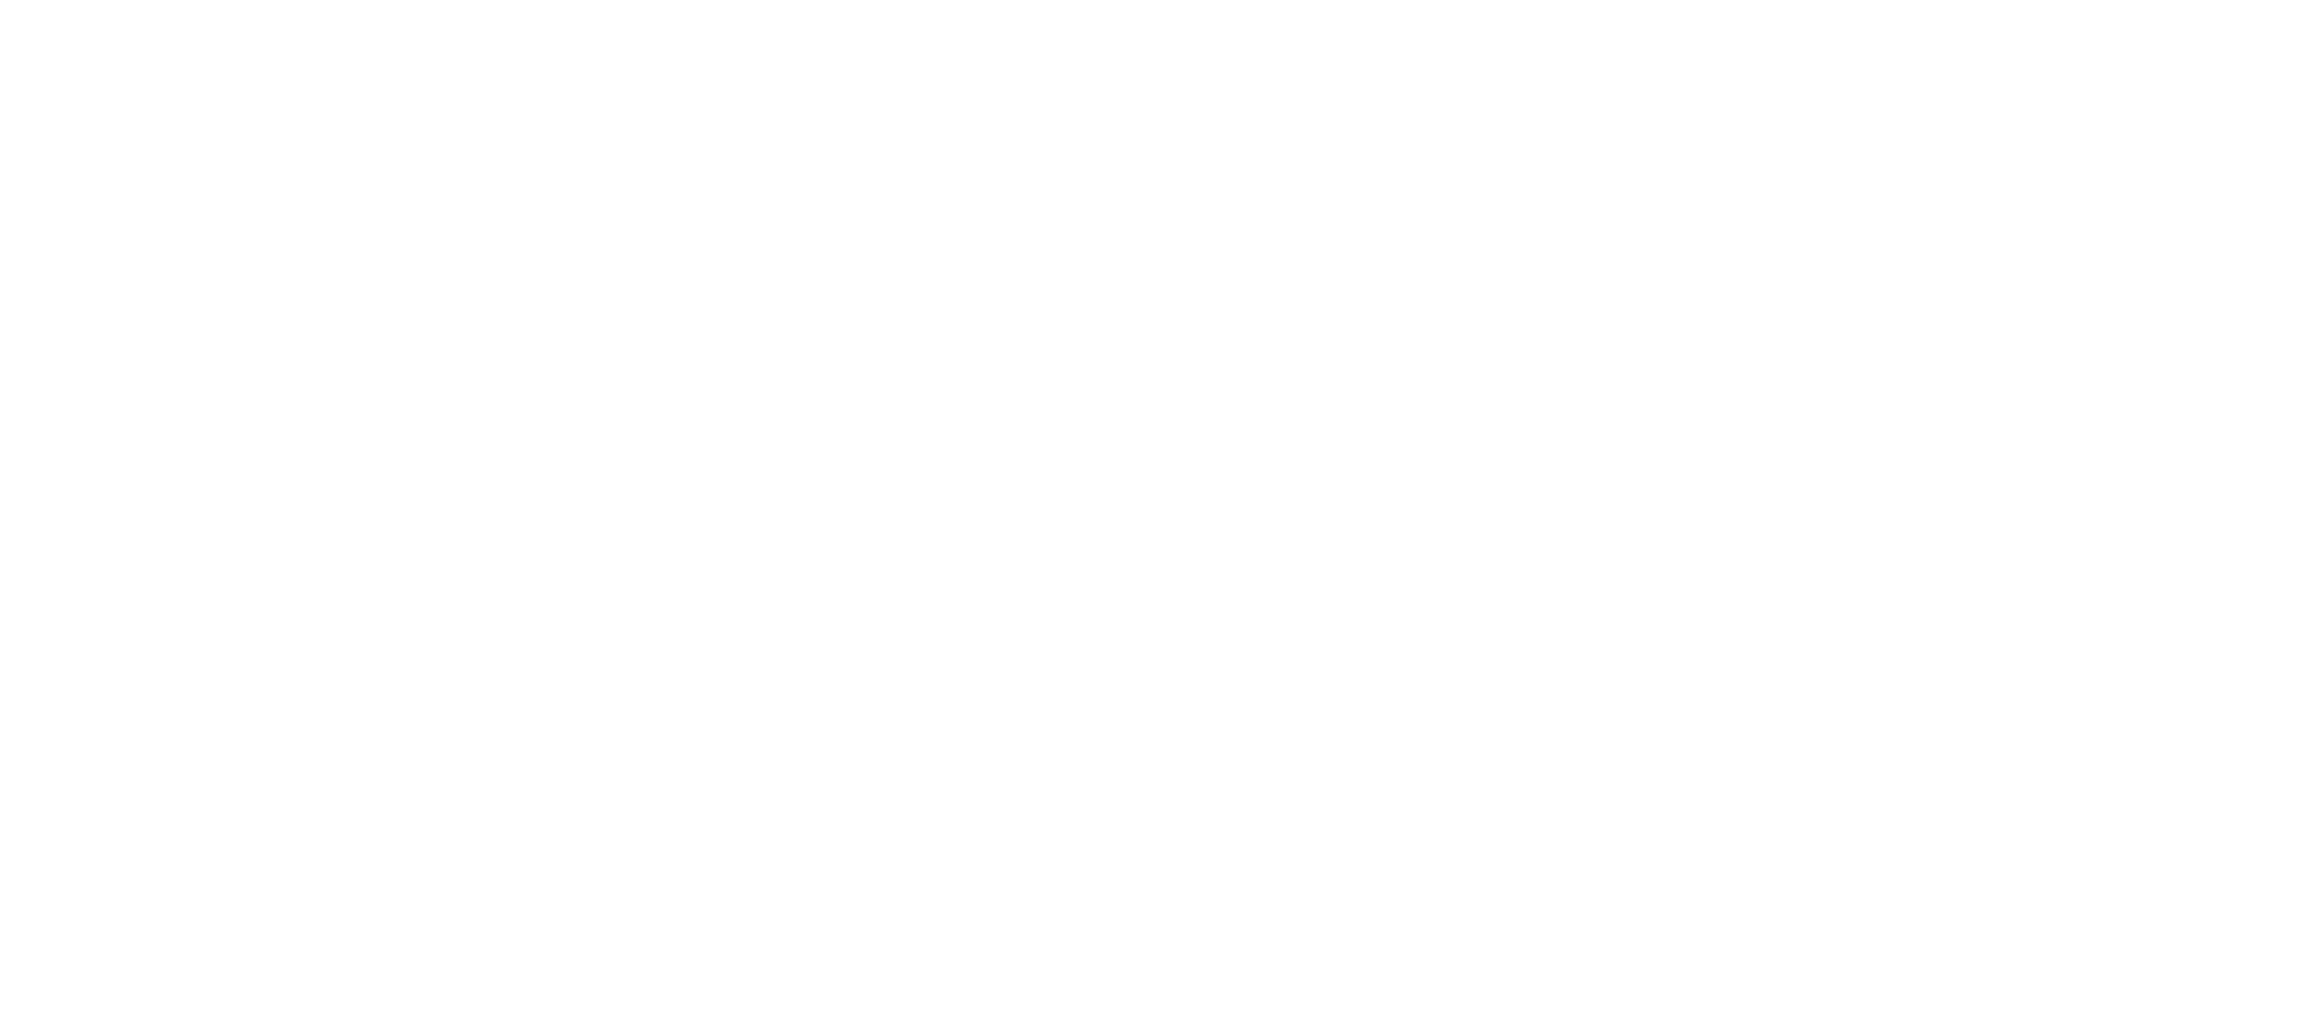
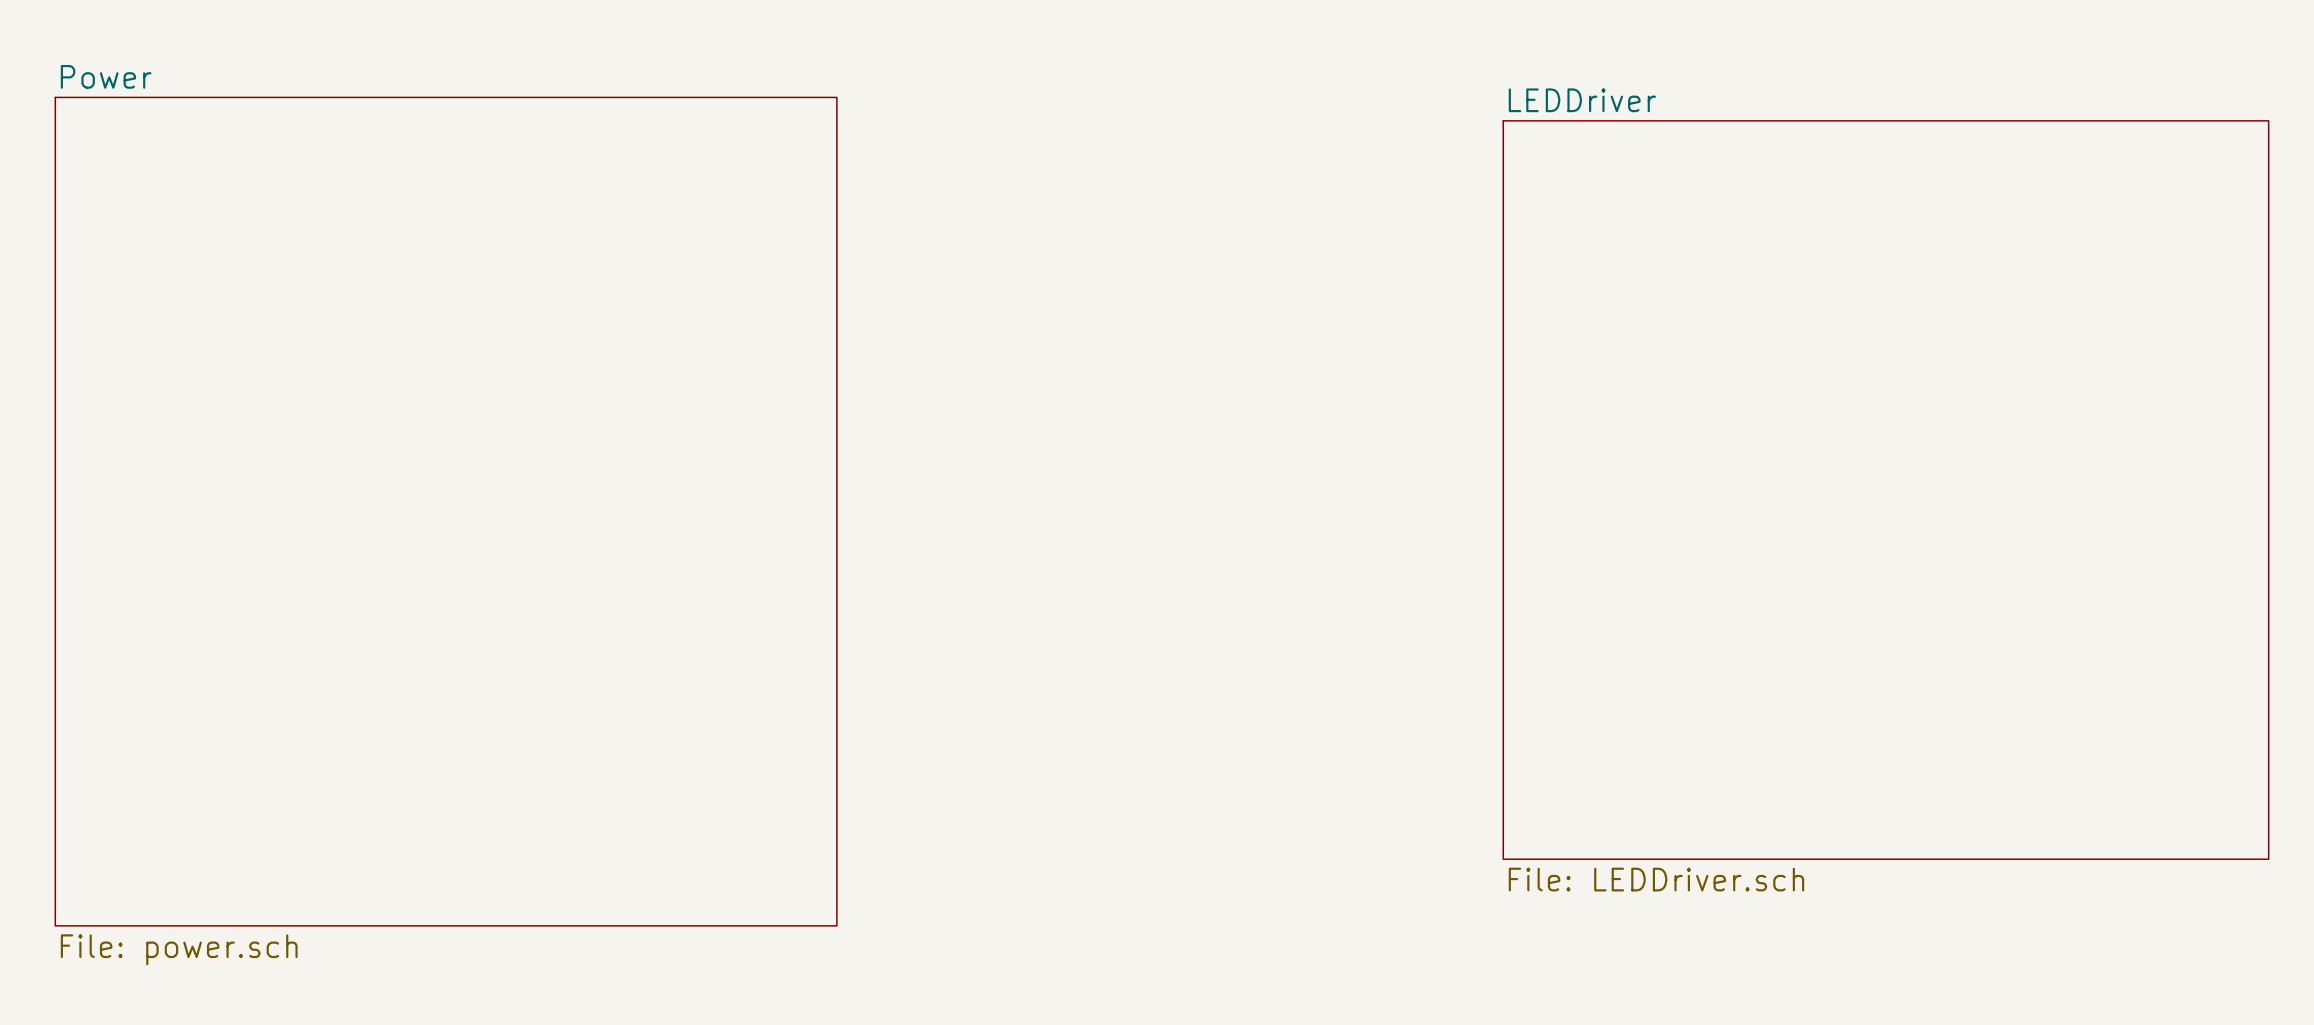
sheet LEDDriver: none -> File: LEDDriver.sch (1885, 490)
sheet Power: none -> File: power.sch (446, 511)

